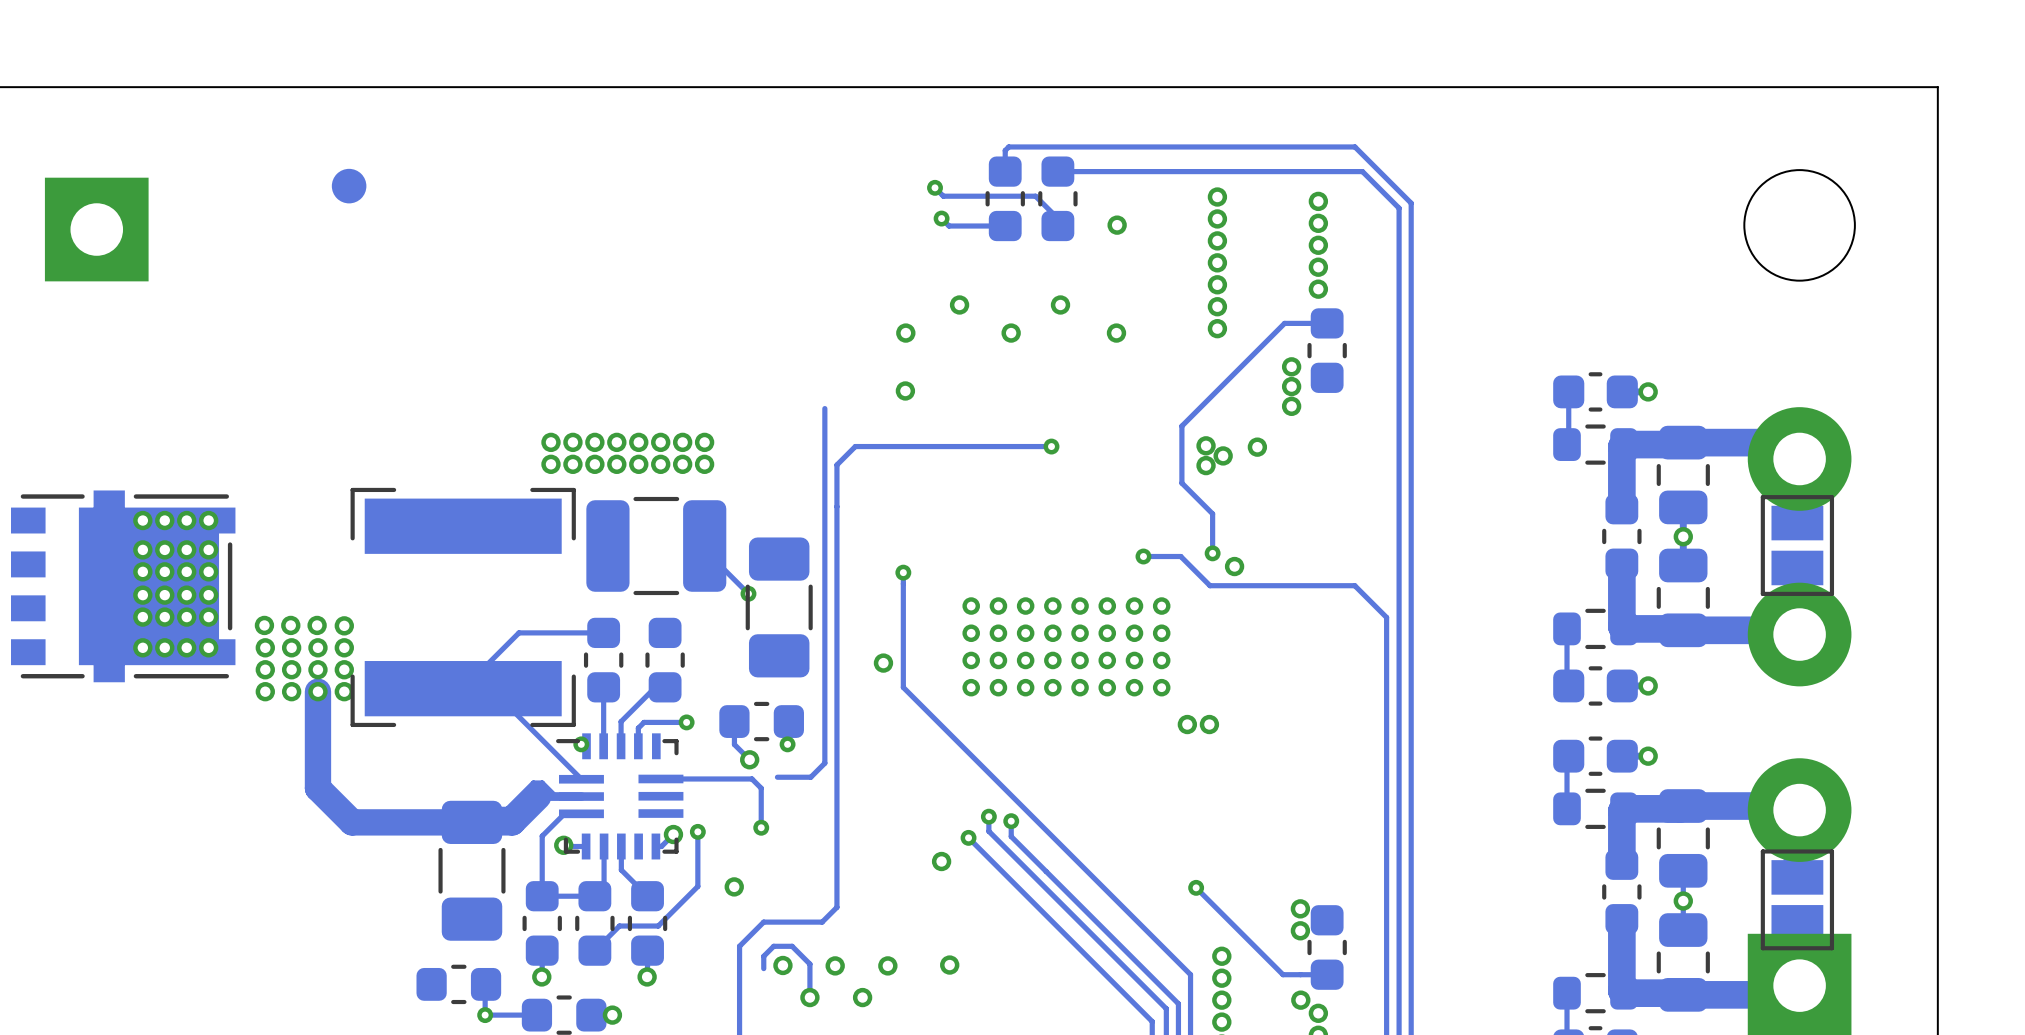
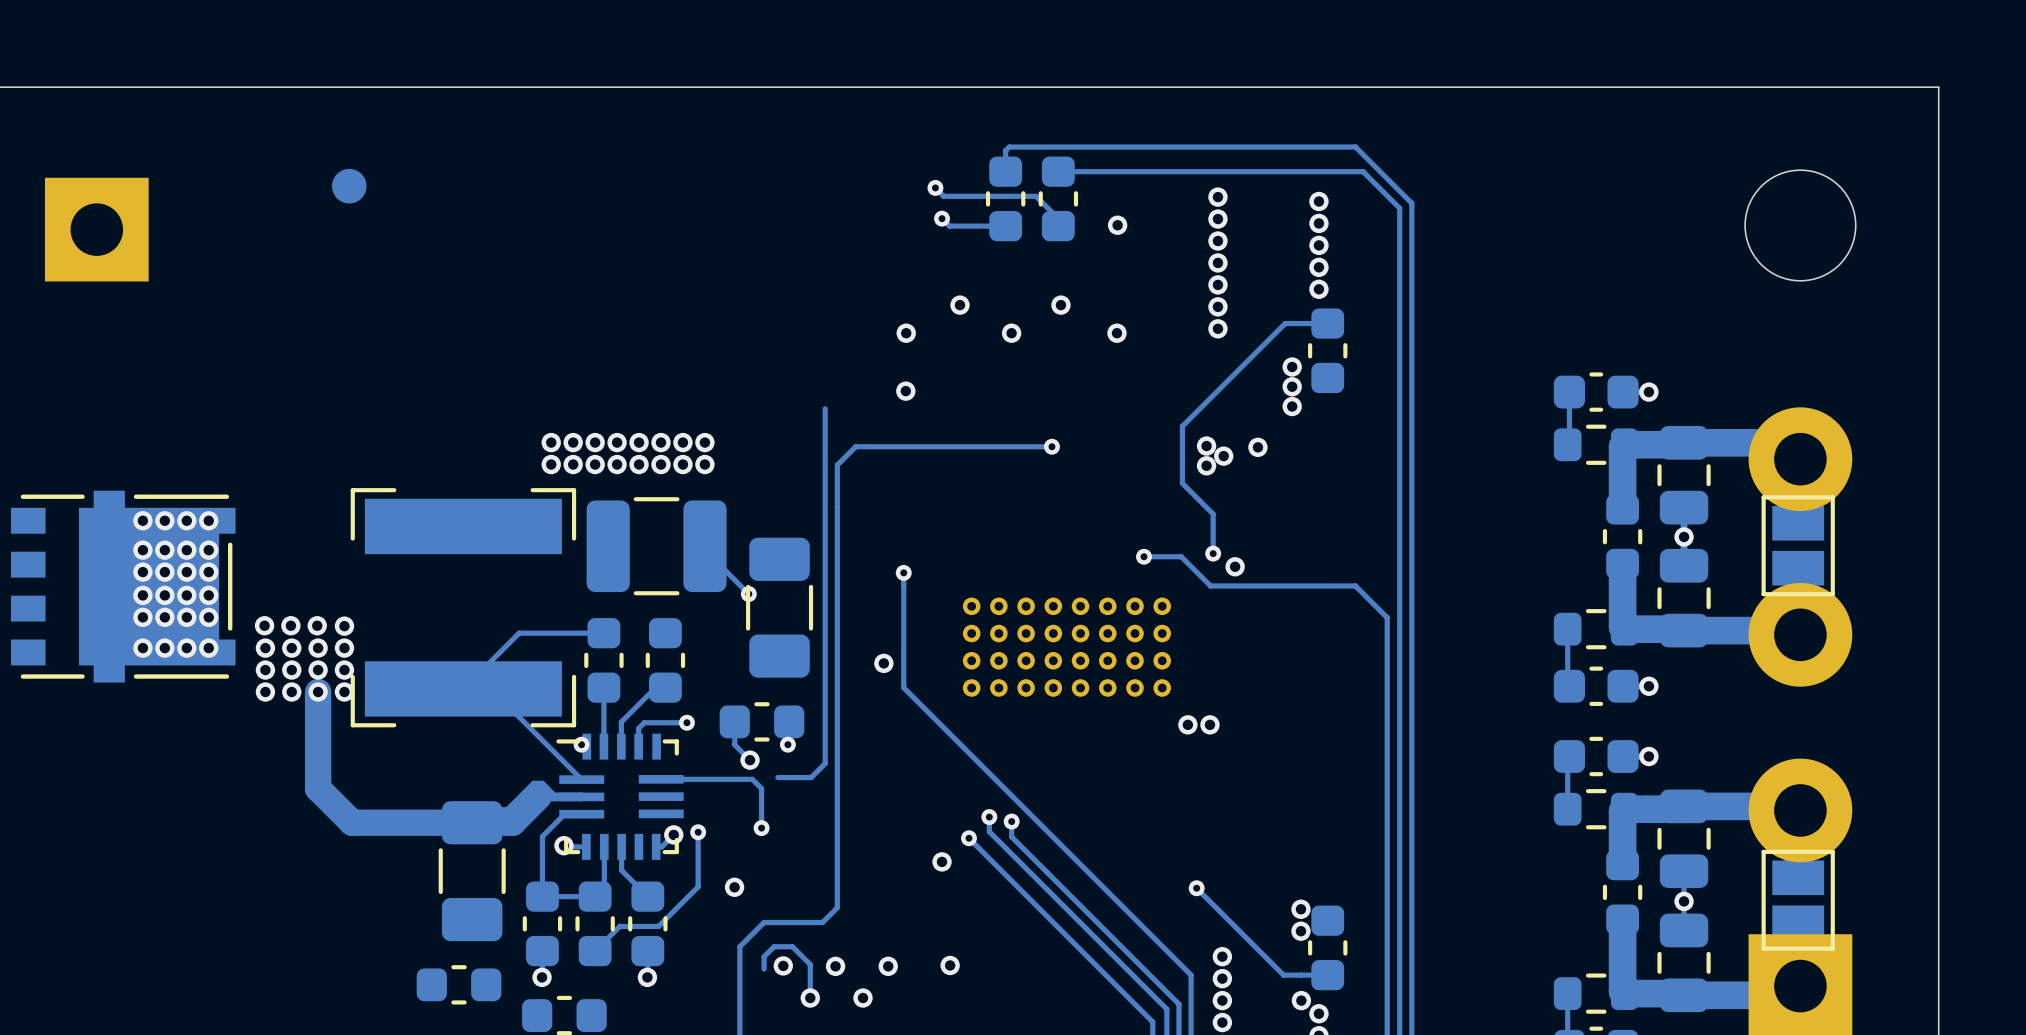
track: (486, 984) (485, 1015) (536, 1015) -> none
via: (485, 1015) -> none
via: (612, 1015) -> none

